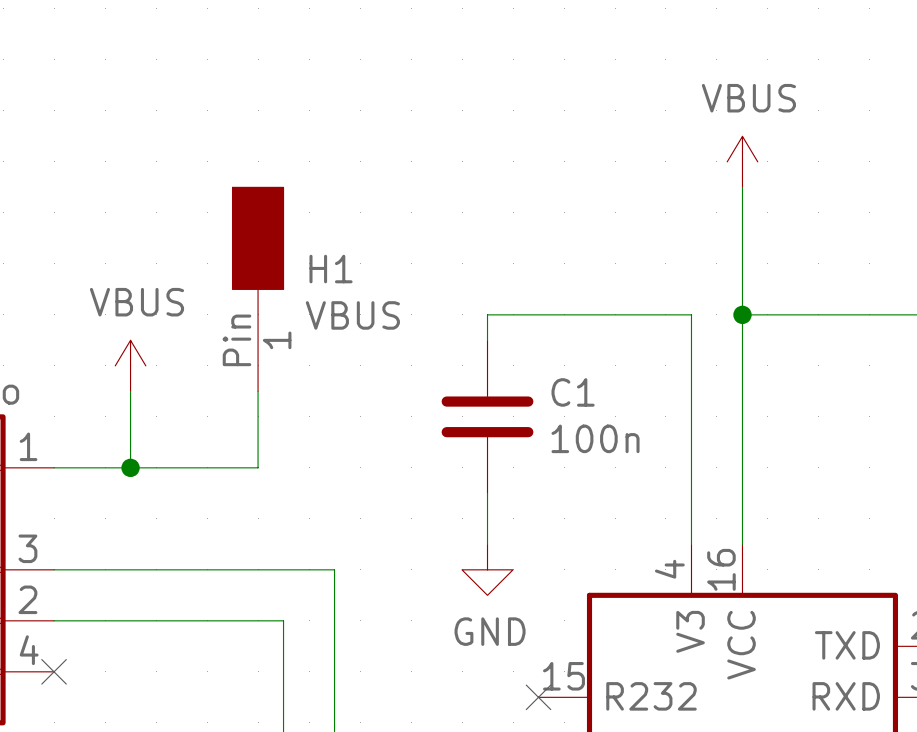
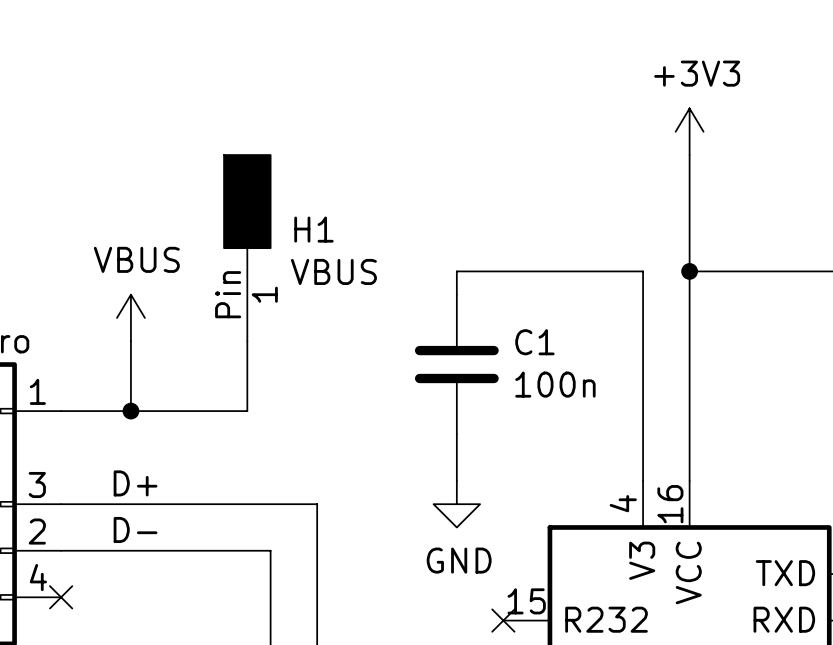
power symbol: VBUS (742, 161) -> +3V3 (689, 131)
label: none -> D+ (135, 483)
label: none -> D- (135, 529)

